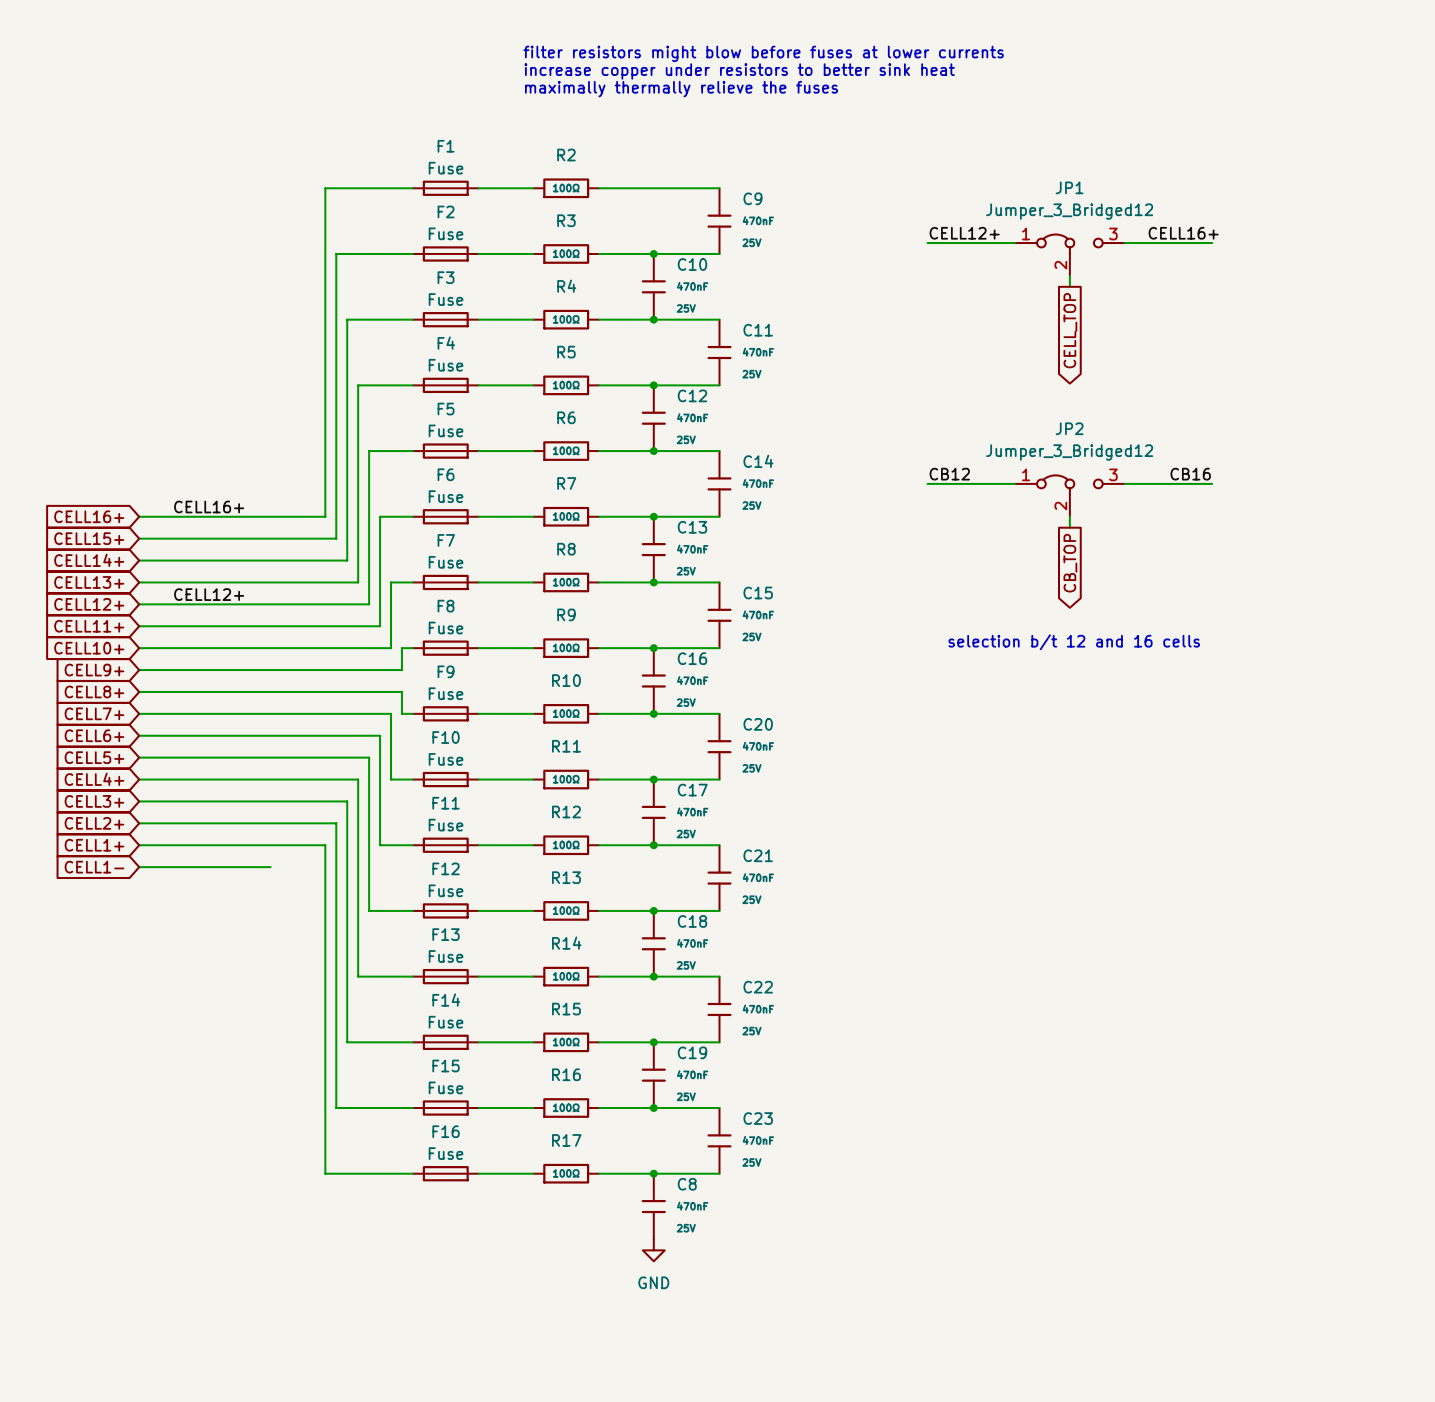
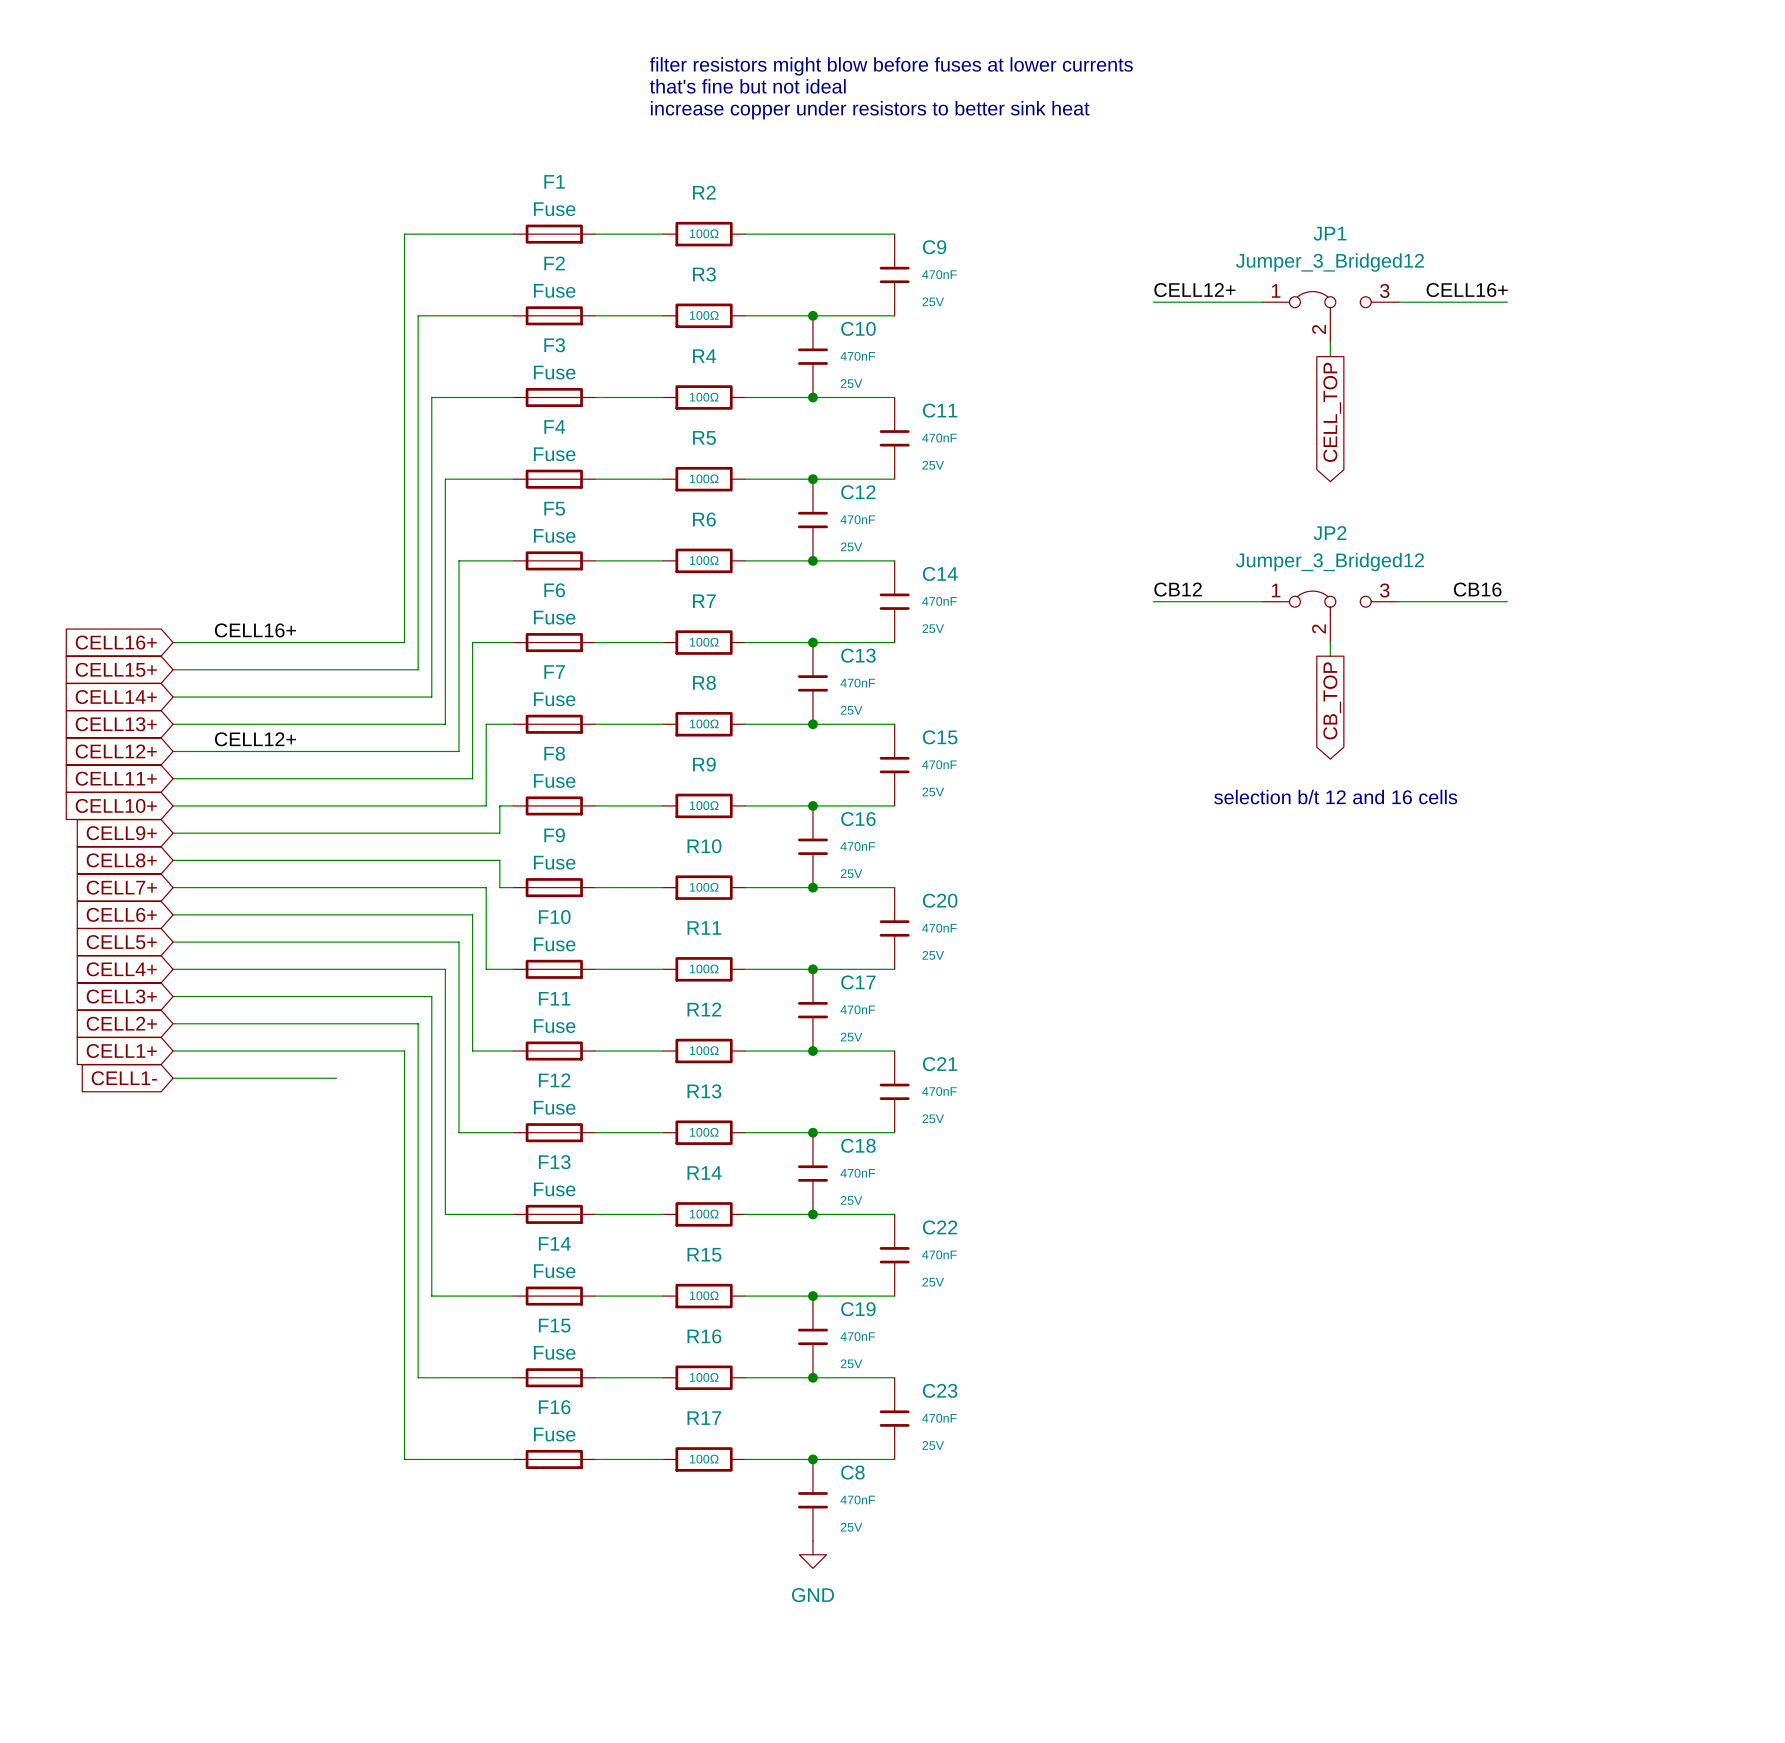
text: increase copper under resistors to better sink heat (739, 71) -> that's fine but not ideal (747, 86)
text: maximally thermally relieve the fuses (681, 89) -> increase copper under resistors to better sink heat (870, 110)

